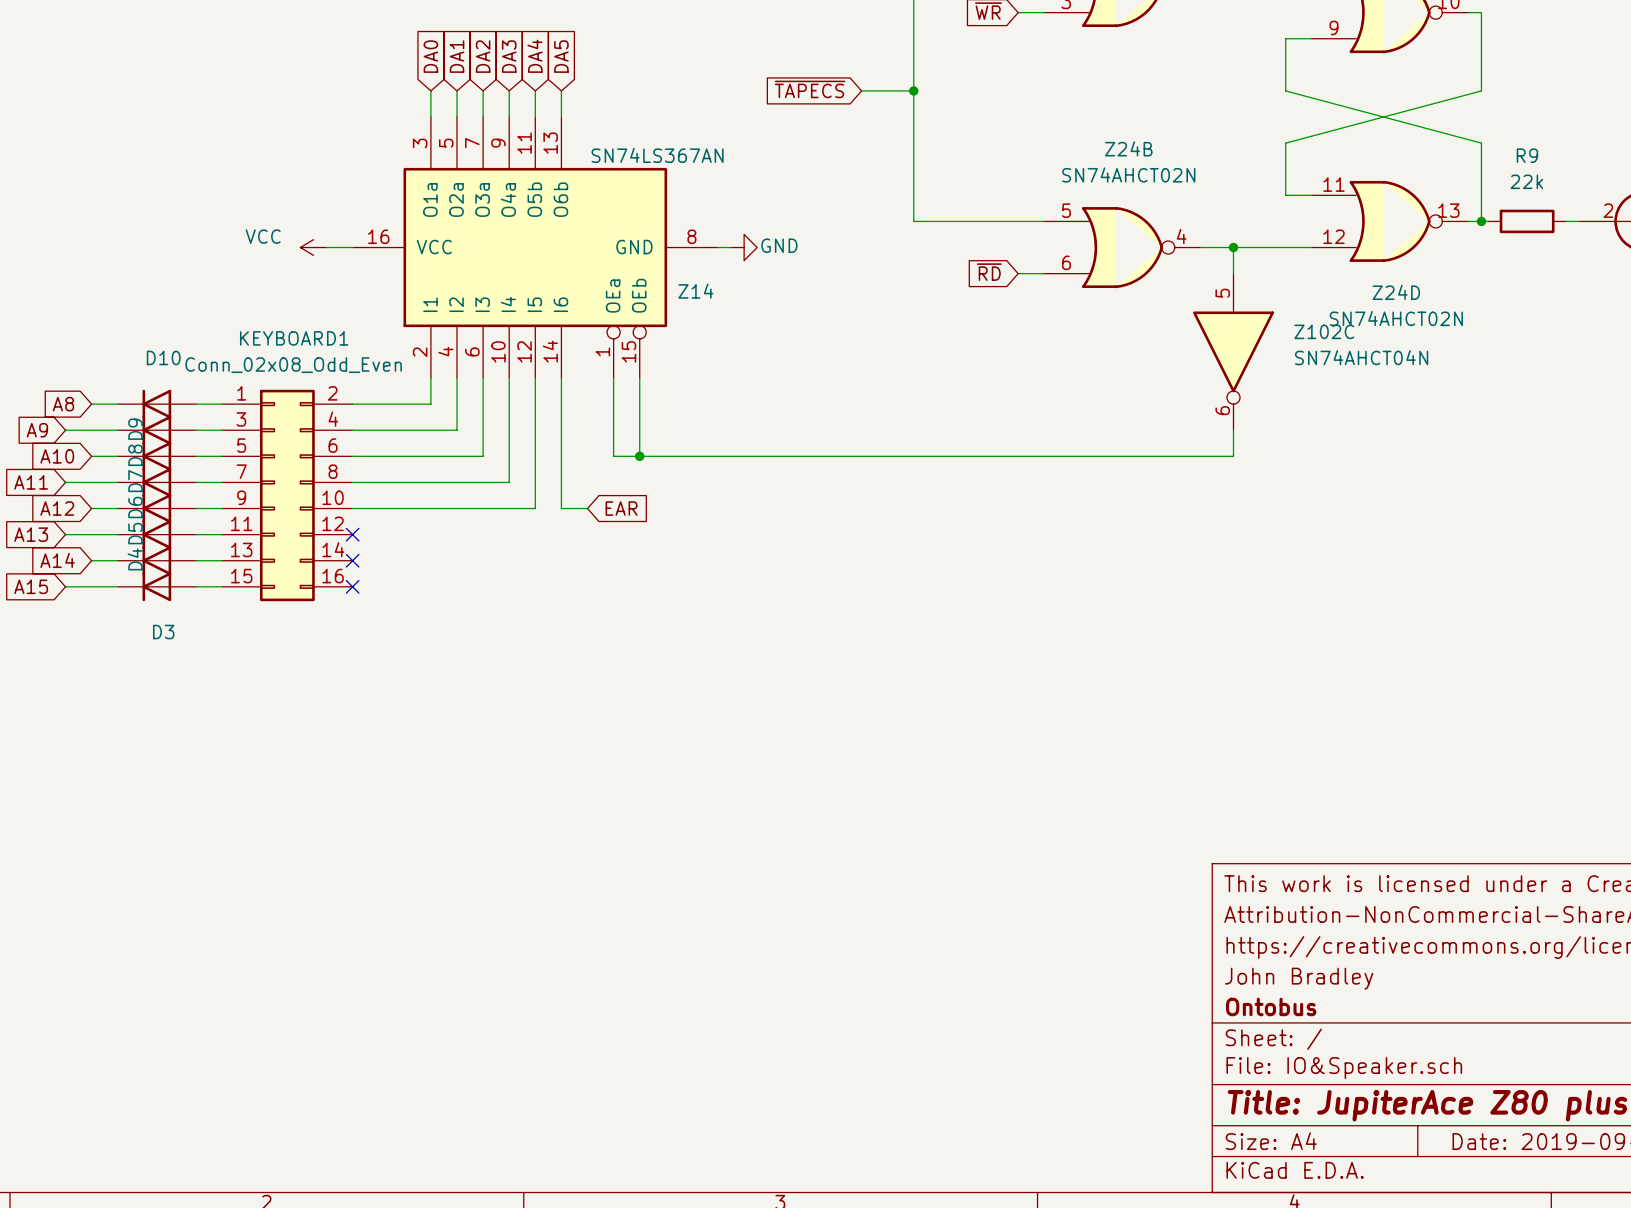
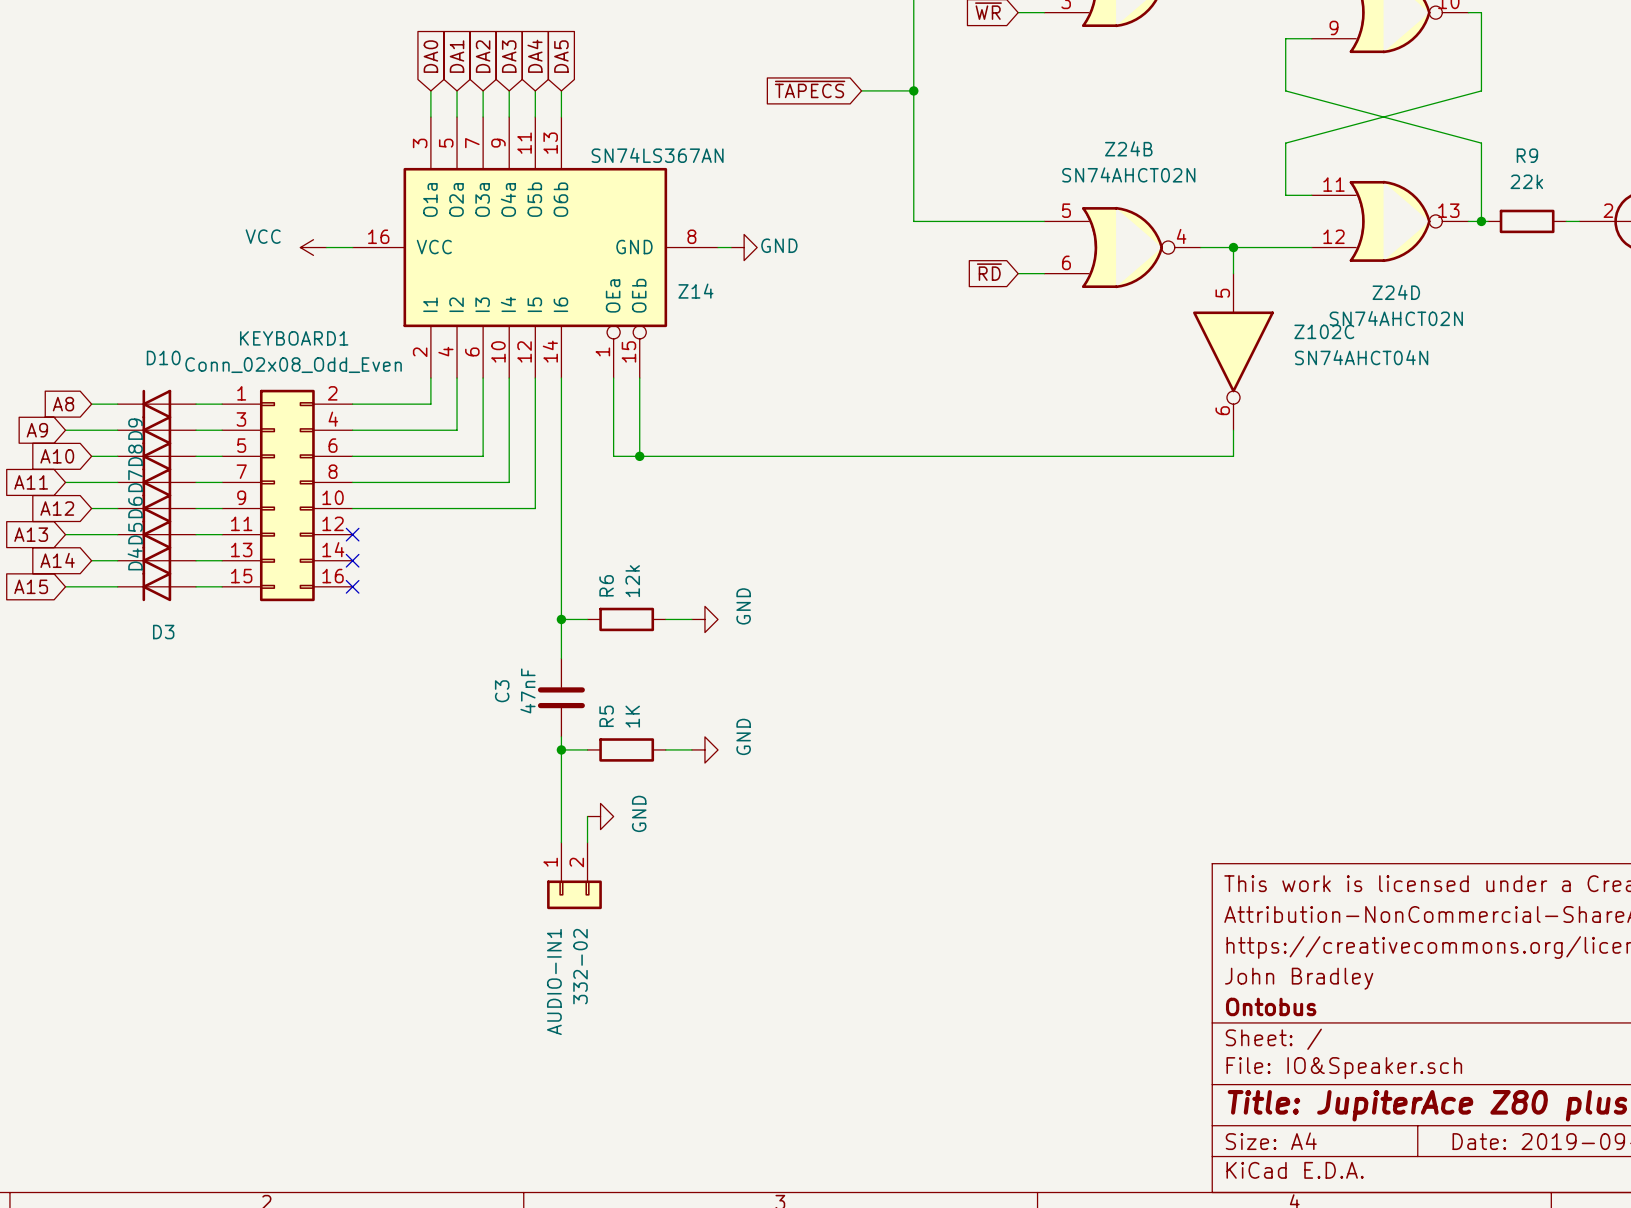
wire: (561, 508) (587, 508) -> (561, 508) (561, 658)
global label: EAR (621, 508) -> none
wire: none -> (561, 619) (587, 619)
junction: none -> (561, 619)
R6: none -> 12k (626, 619)
wire: none -> (665, 619) (691, 619)
power symbol: none -> GND (704, 619)
C3: none -> 47nF (561, 697)
wire: none -> (561, 736) (561, 842)
wire: none -> (561, 749) (587, 749)
junction: none -> (561, 749)
R5: none -> 1K (626, 749)
wire: none -> (665, 749) (691, 749)
power symbol: none -> GND (704, 749)
wire: none -> (587, 816) (587, 842)
power symbol: none -> GND (600, 816)
AUDIO-IN1: none -> 332-02 (574, 875)

